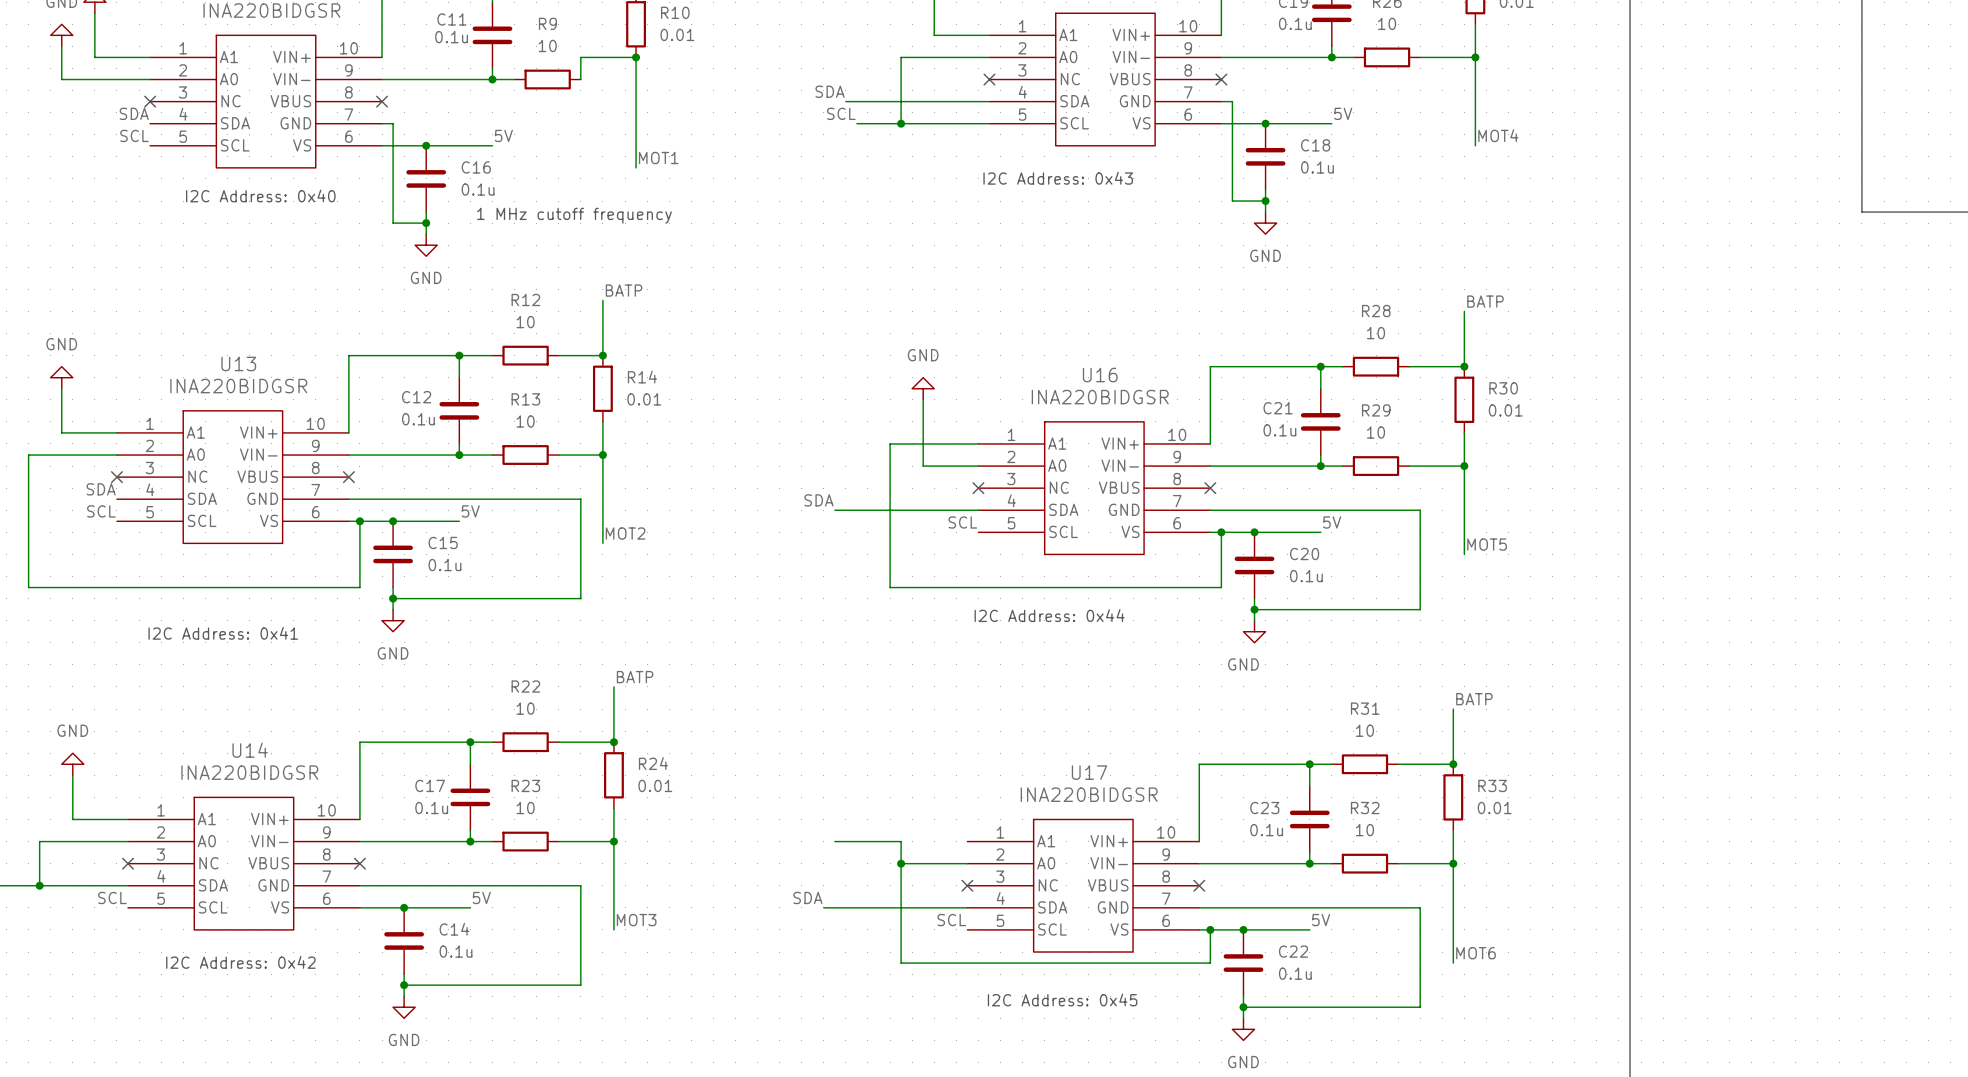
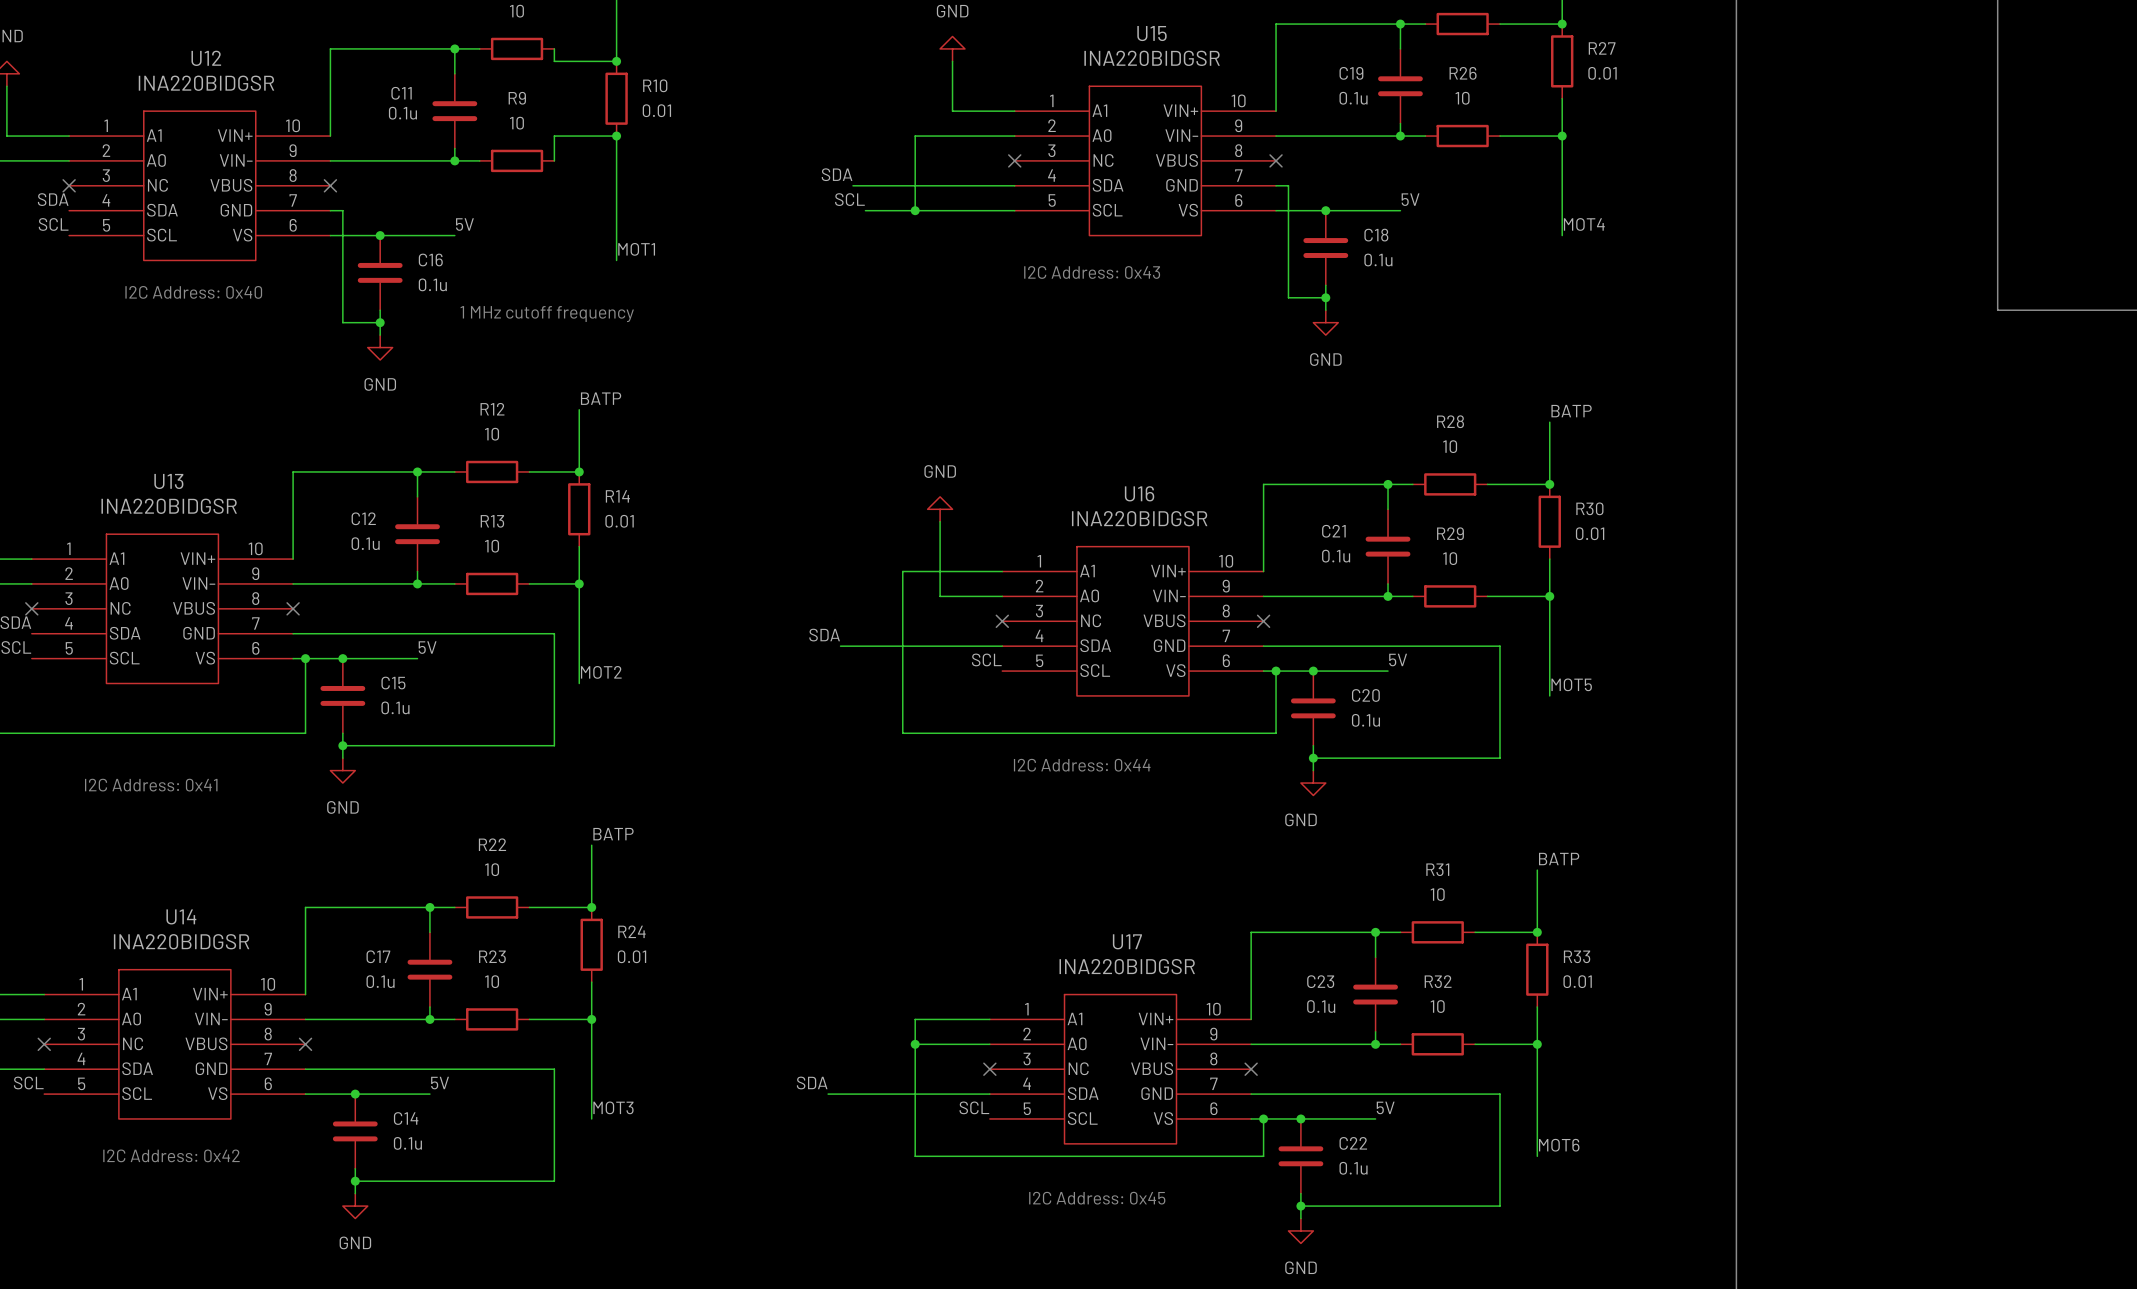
wire: (834, 841) (901, 841) -> (989, 1019) (915, 1019)

